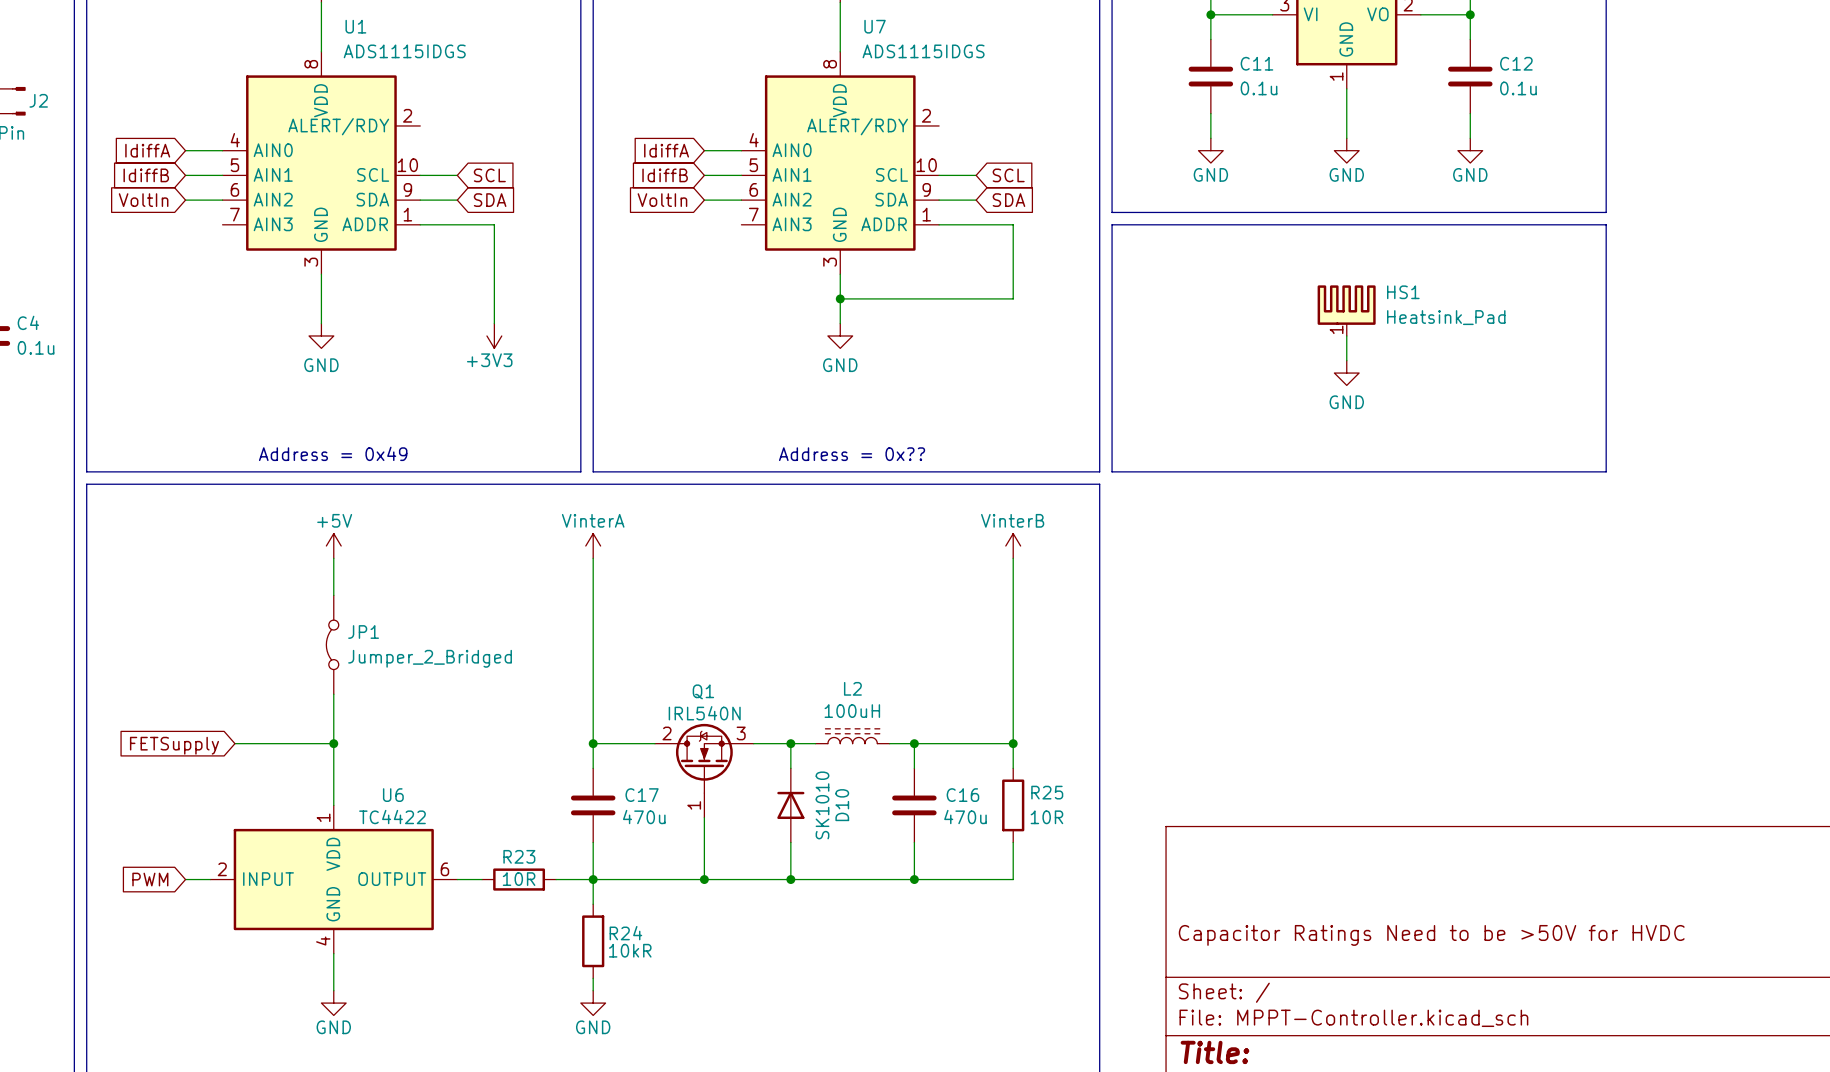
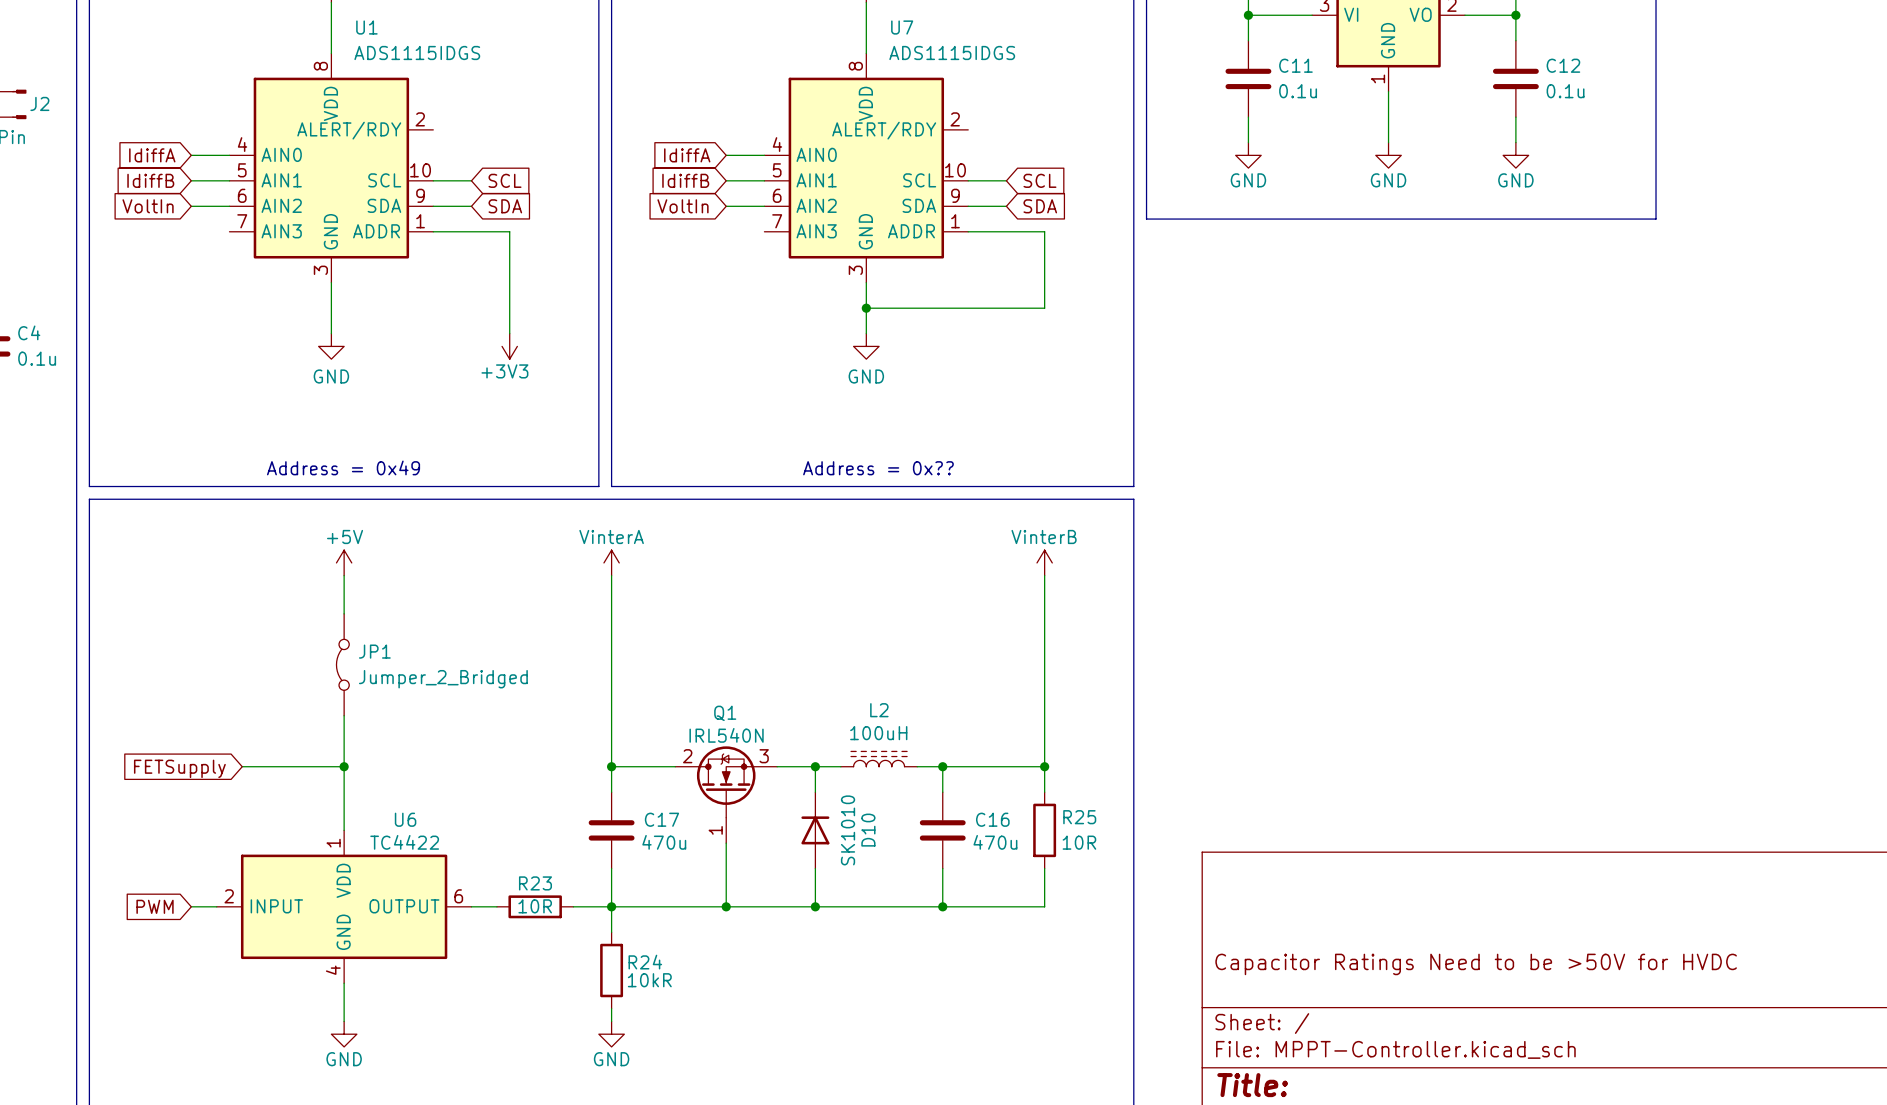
line: (1112, 224) (1606, 224) (1606, 471) (1112, 471) (1112, 224) -> none
HS1: Heatsink_Pad (1346, 310) -> none
wire: (1346, 335) (1346, 360) -> none
power symbol: GND (1346, 373) -> none

